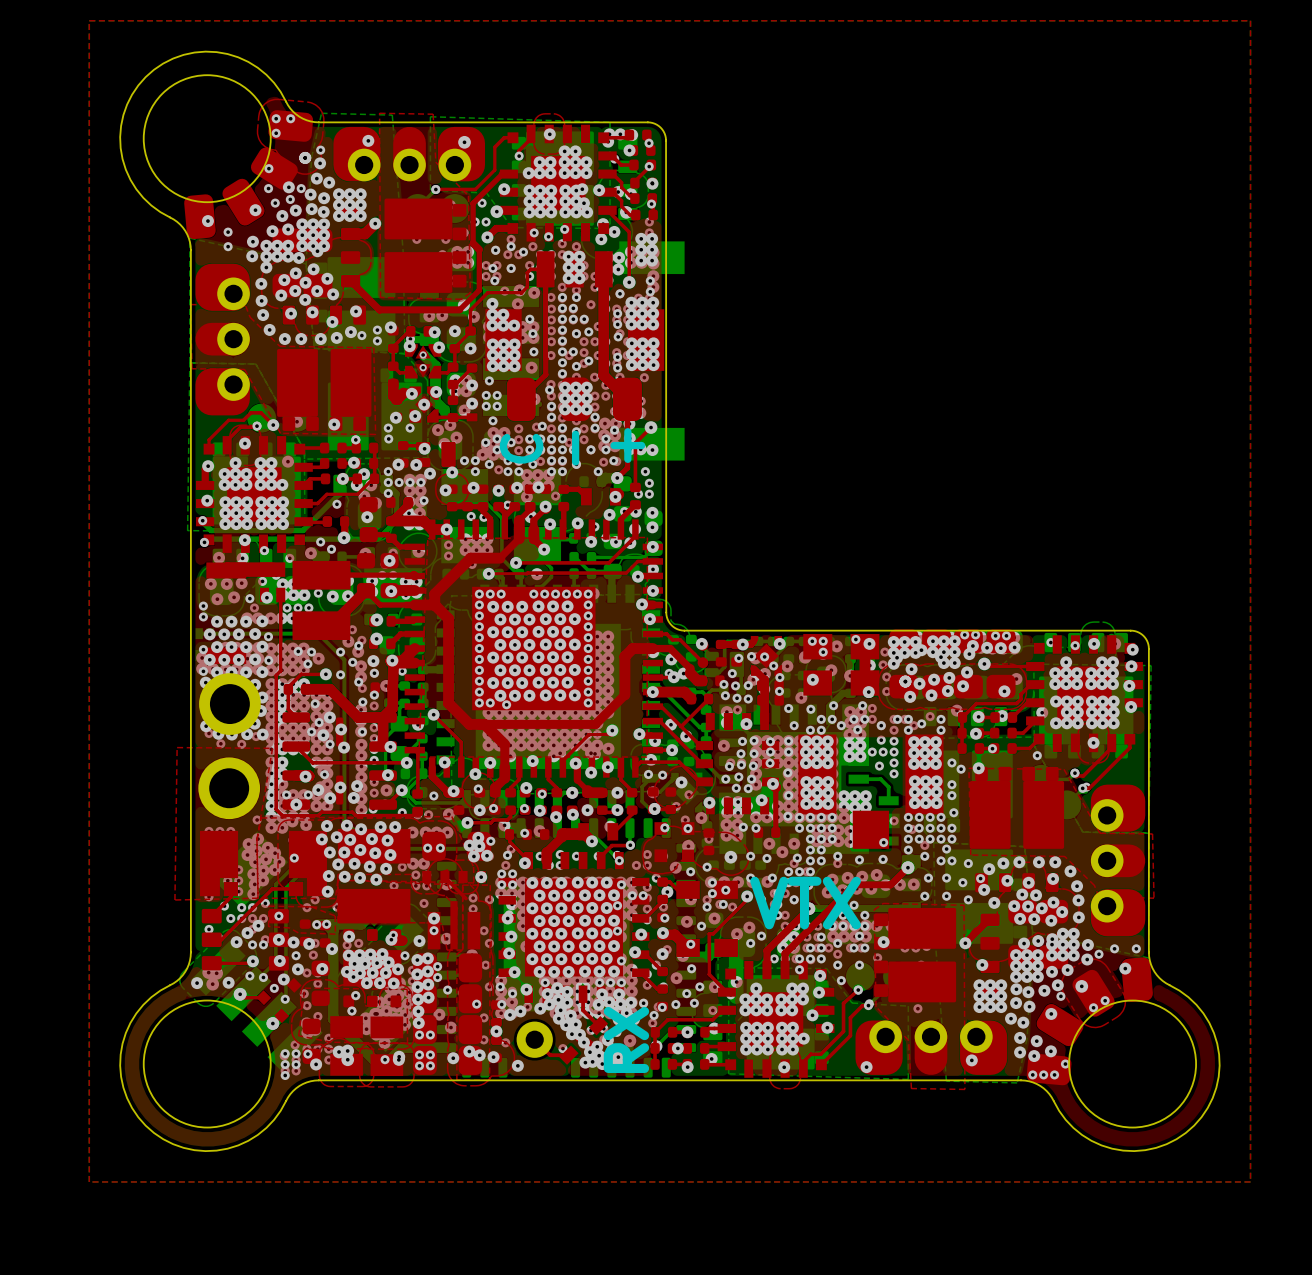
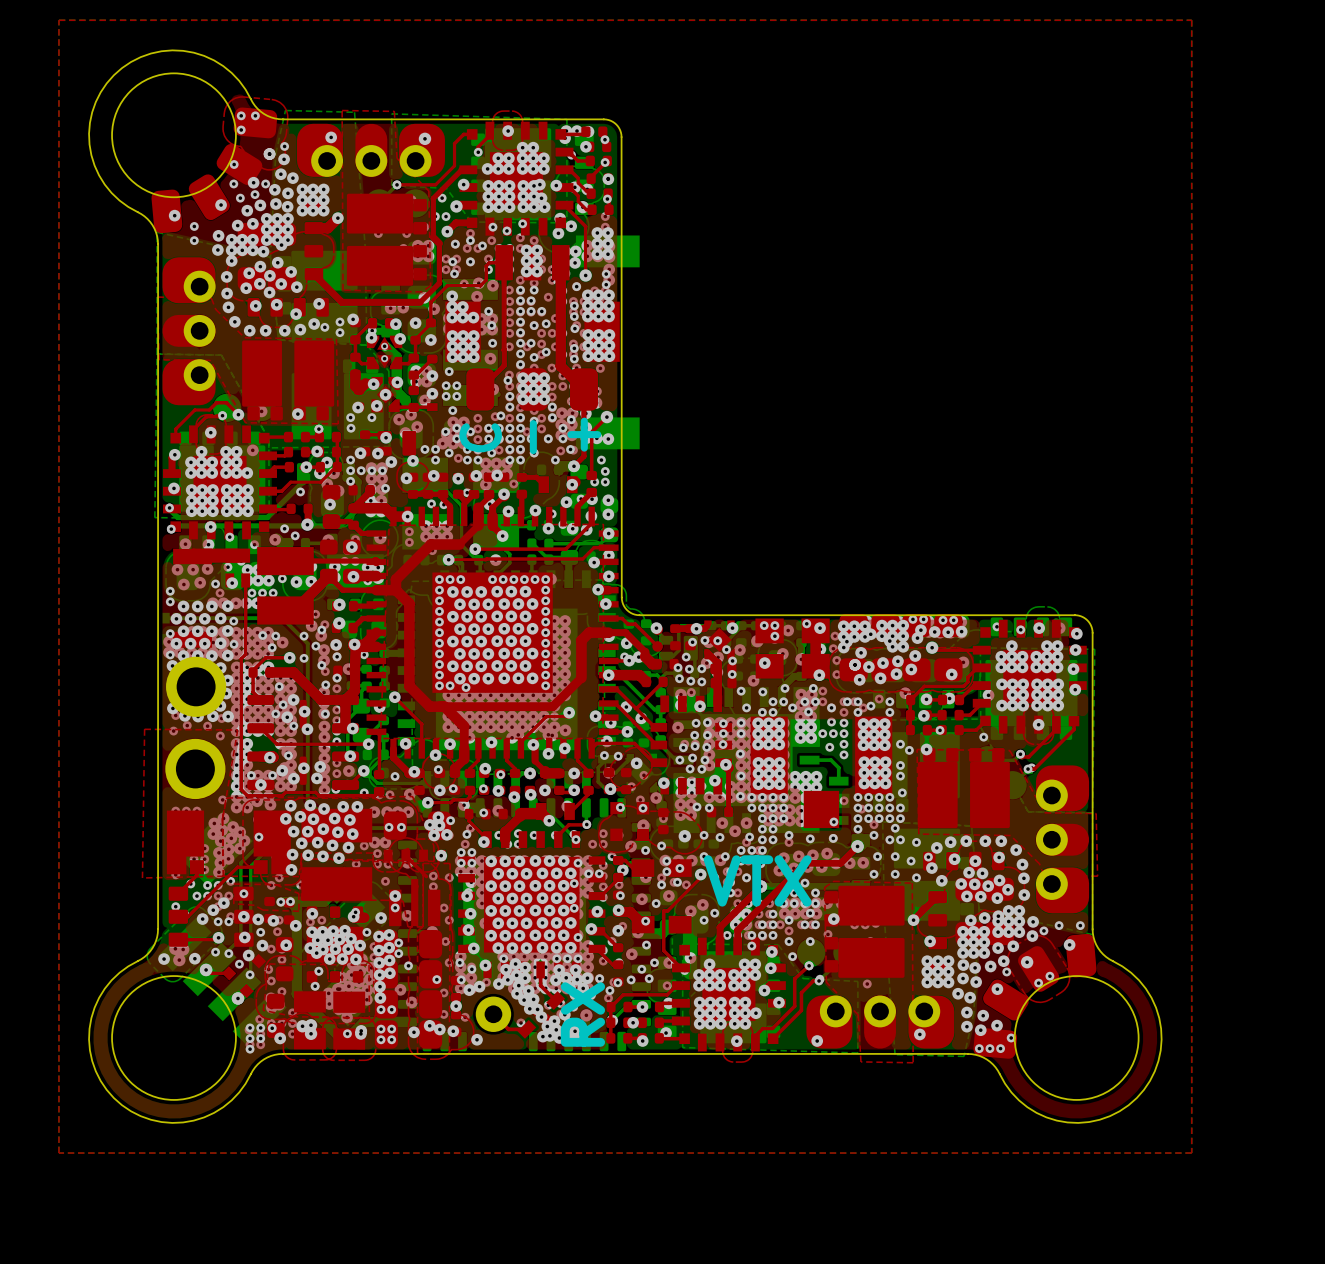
via: none -> (173, 731)
via: none -> (220, 736)

